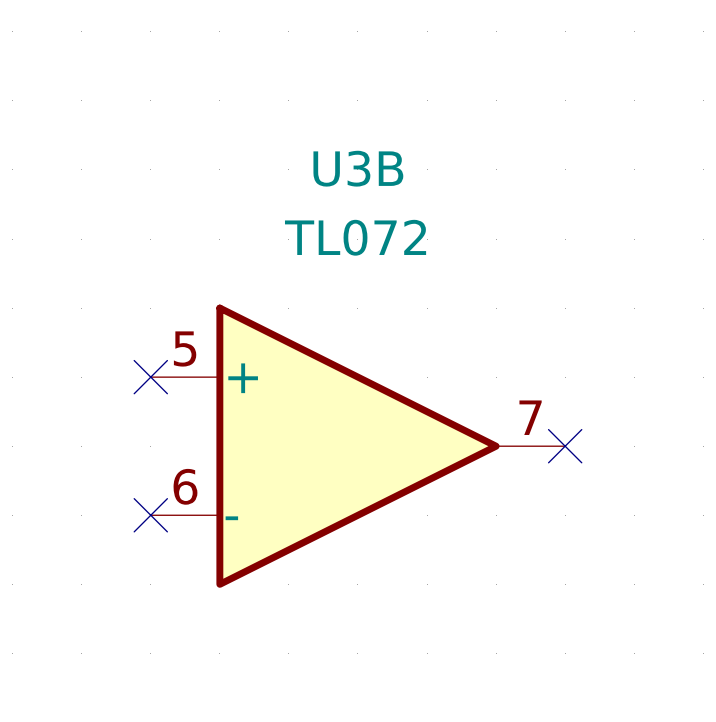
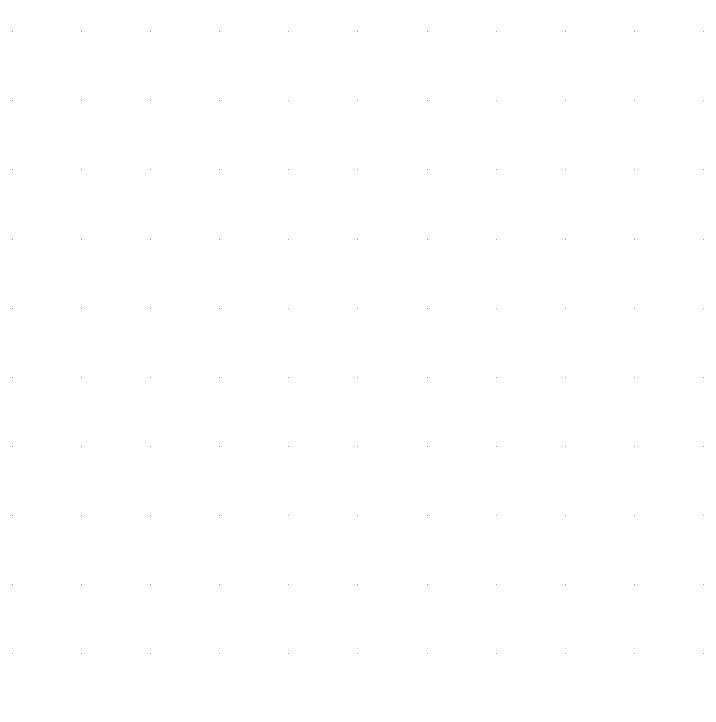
no-connect mark: (150, 377) -> none
U3B: TL072 (357, 446) -> none
no-connect mark: (565, 446) -> none
no-connect mark: (150, 515) -> none

